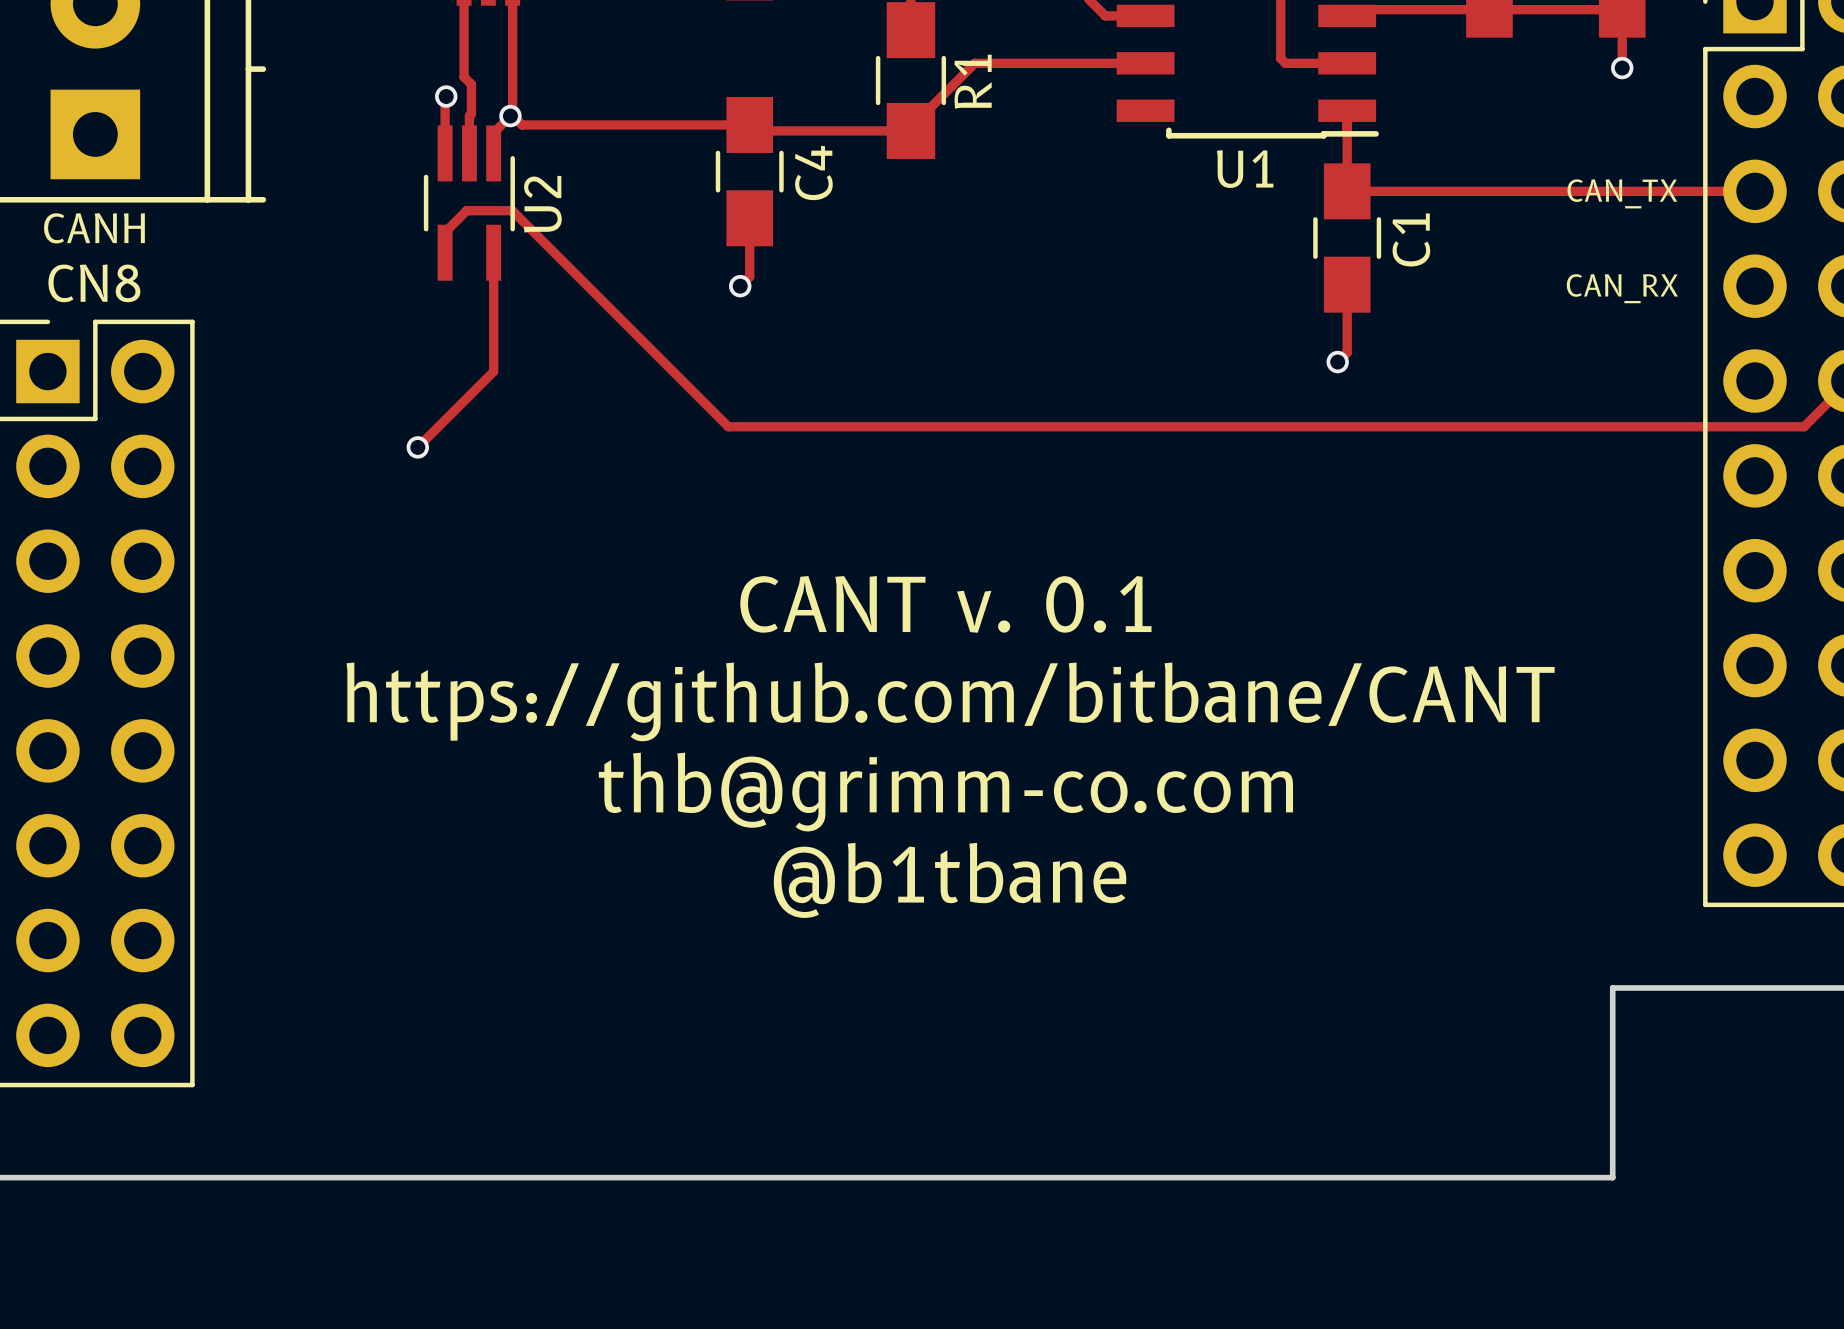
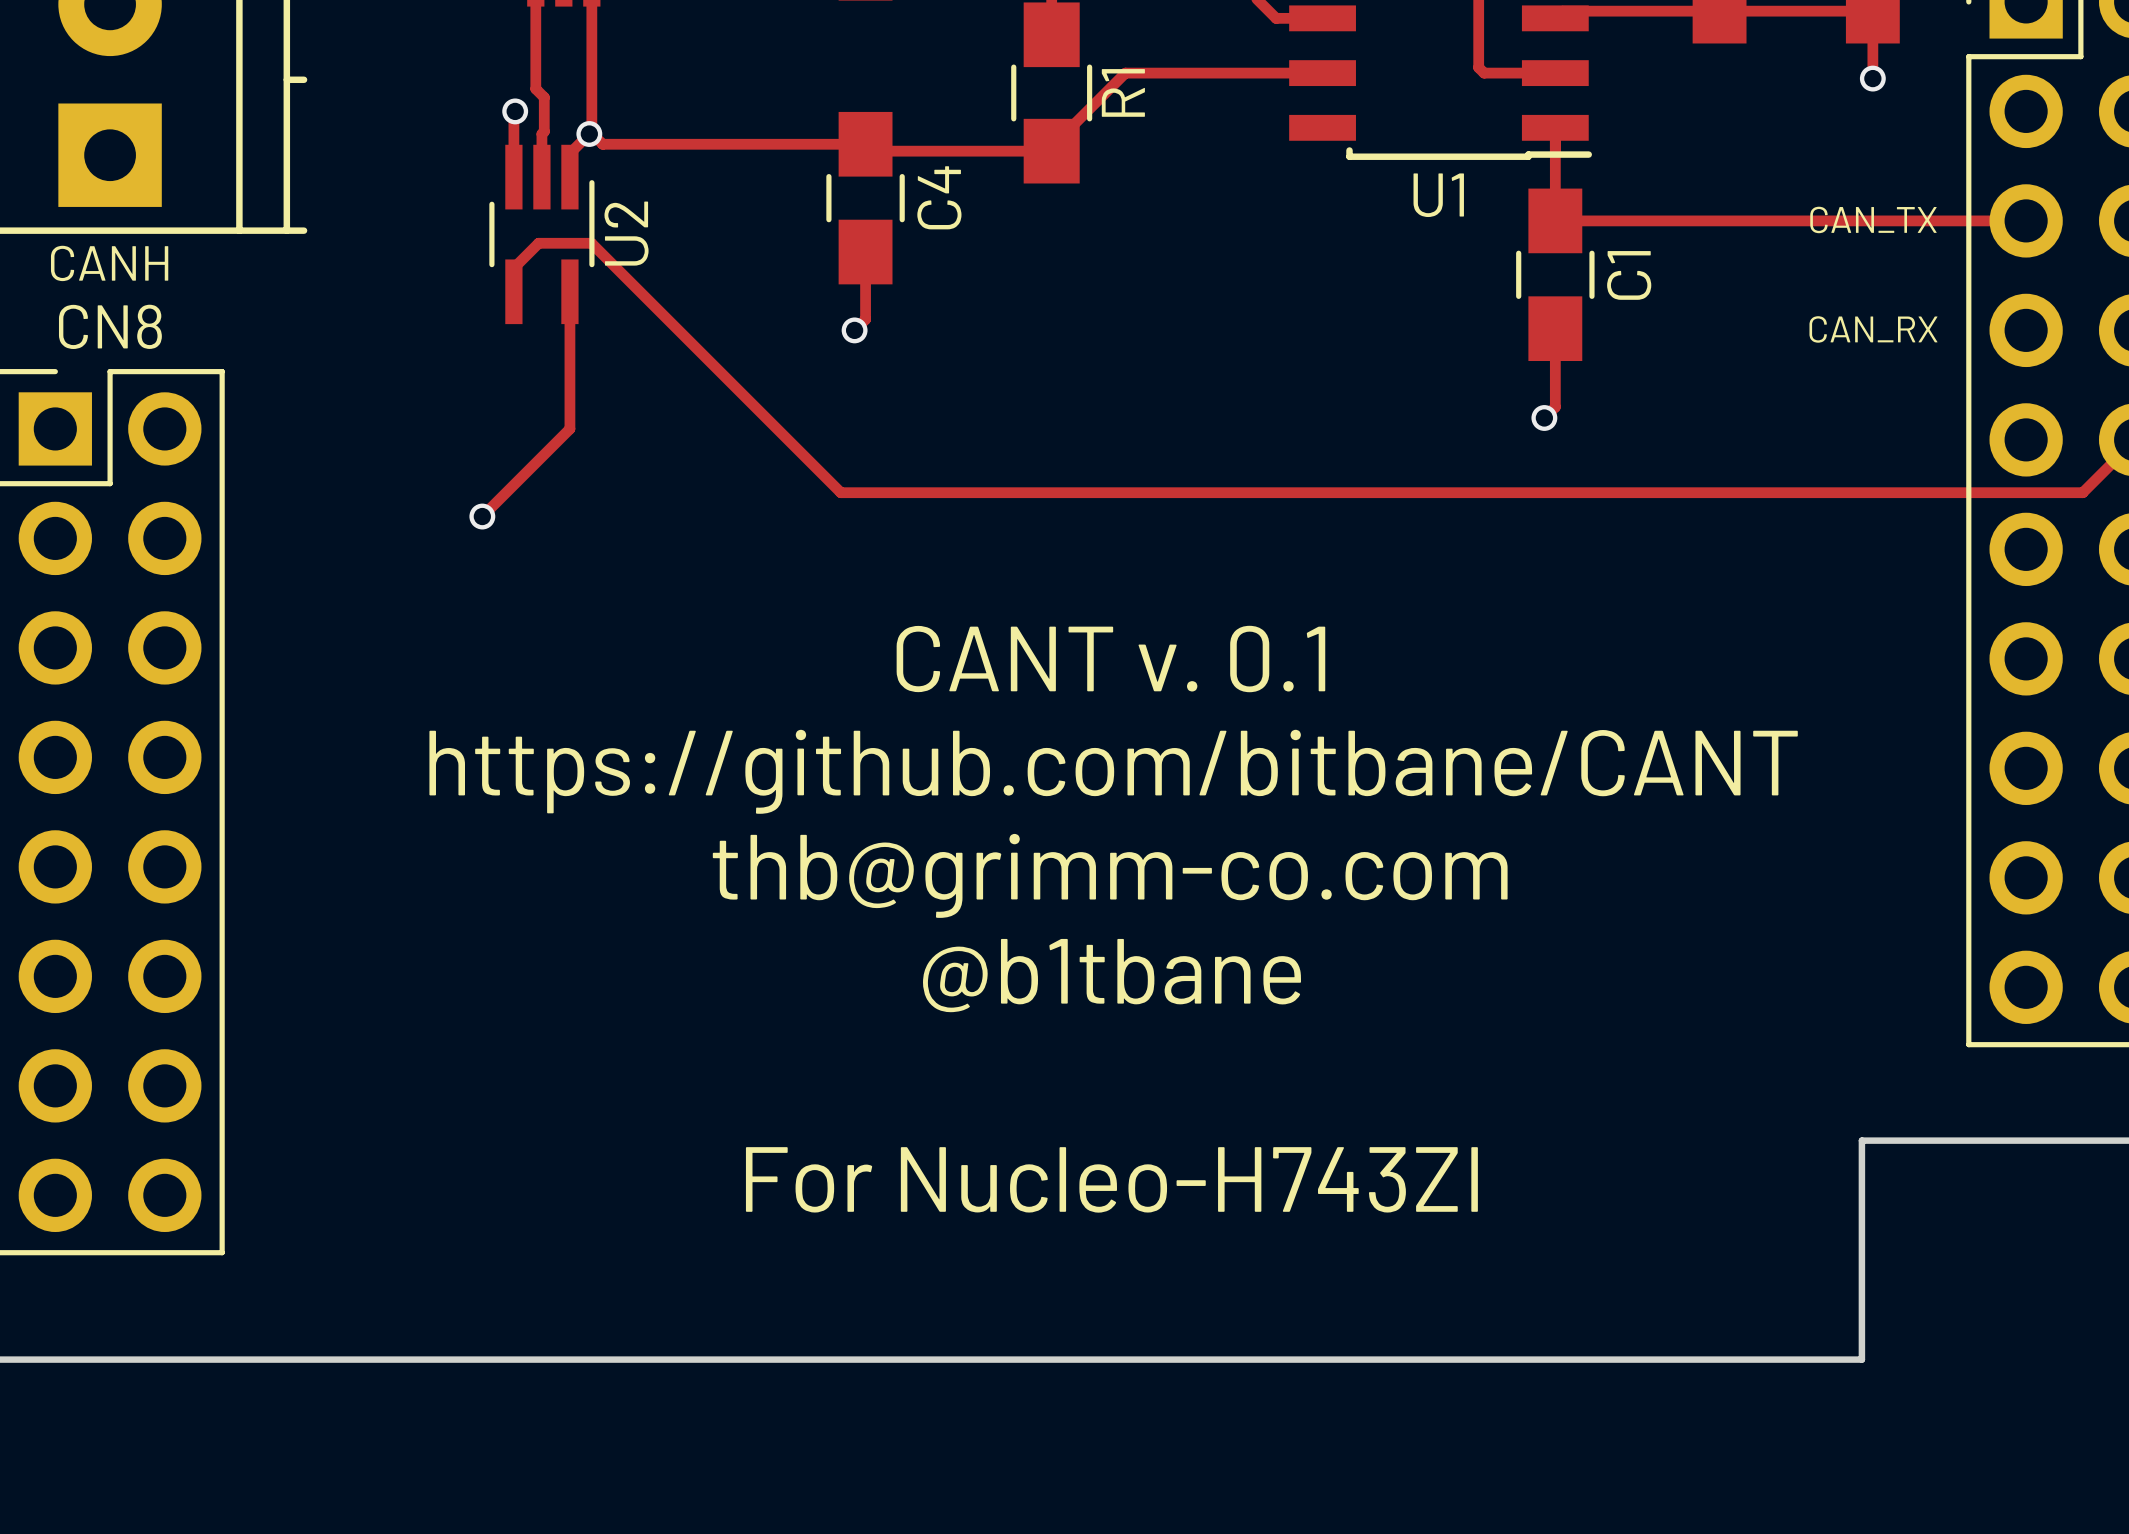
text position: CANT v. 0.1 (945, 604) -> CANT v. 0.1 (1110, 659)
text position: https://github.com/bitbane/CANT (950, 701) -> https://github.com/bitbane/CANT (1113, 771)
text position: thb@grimm-co.com (945, 792) -> thb@grimm-co.com (1110, 875)
text position: @b1tbane (950, 880) -> @b1tbane (1112, 975)
text: none -> For Nucleo-H743ZI (1111, 1179)

